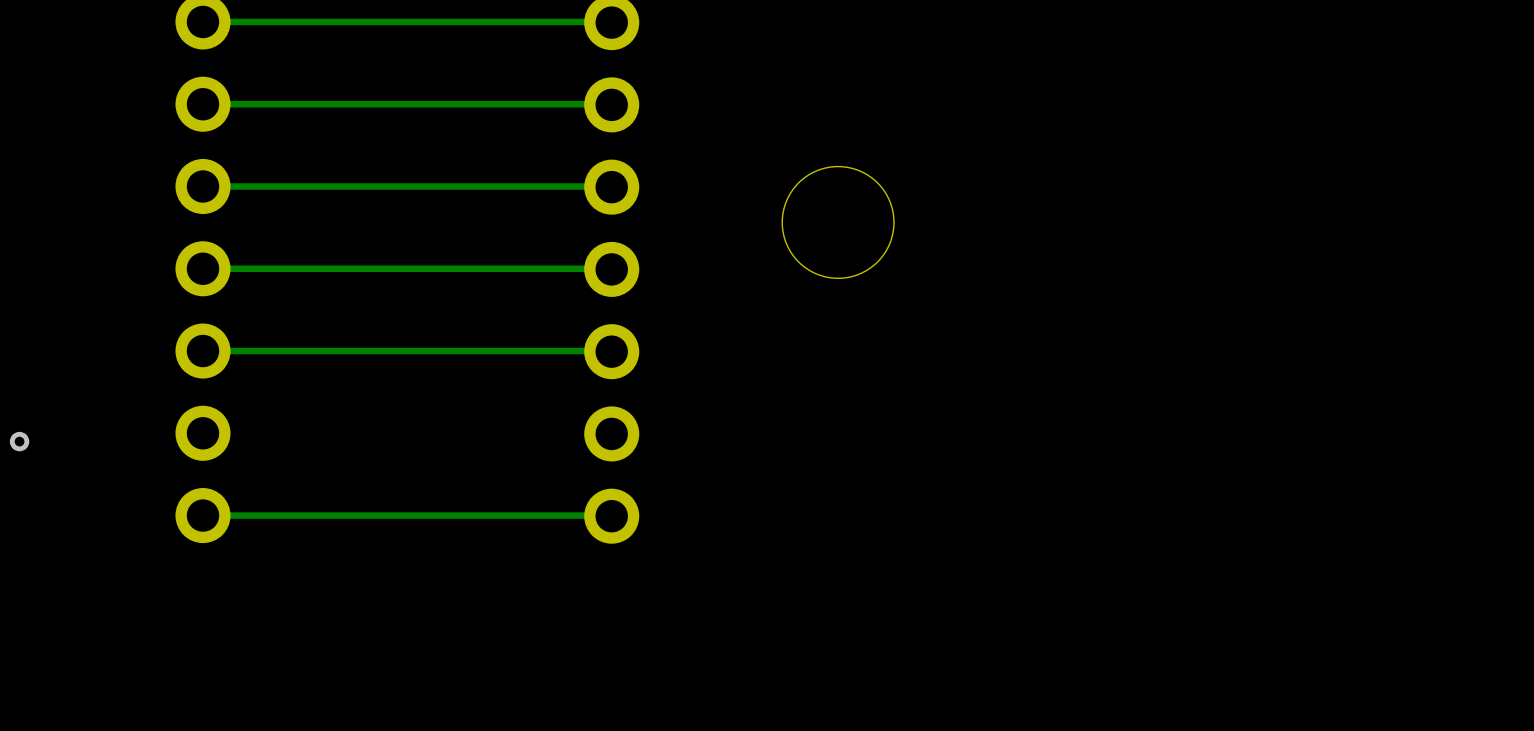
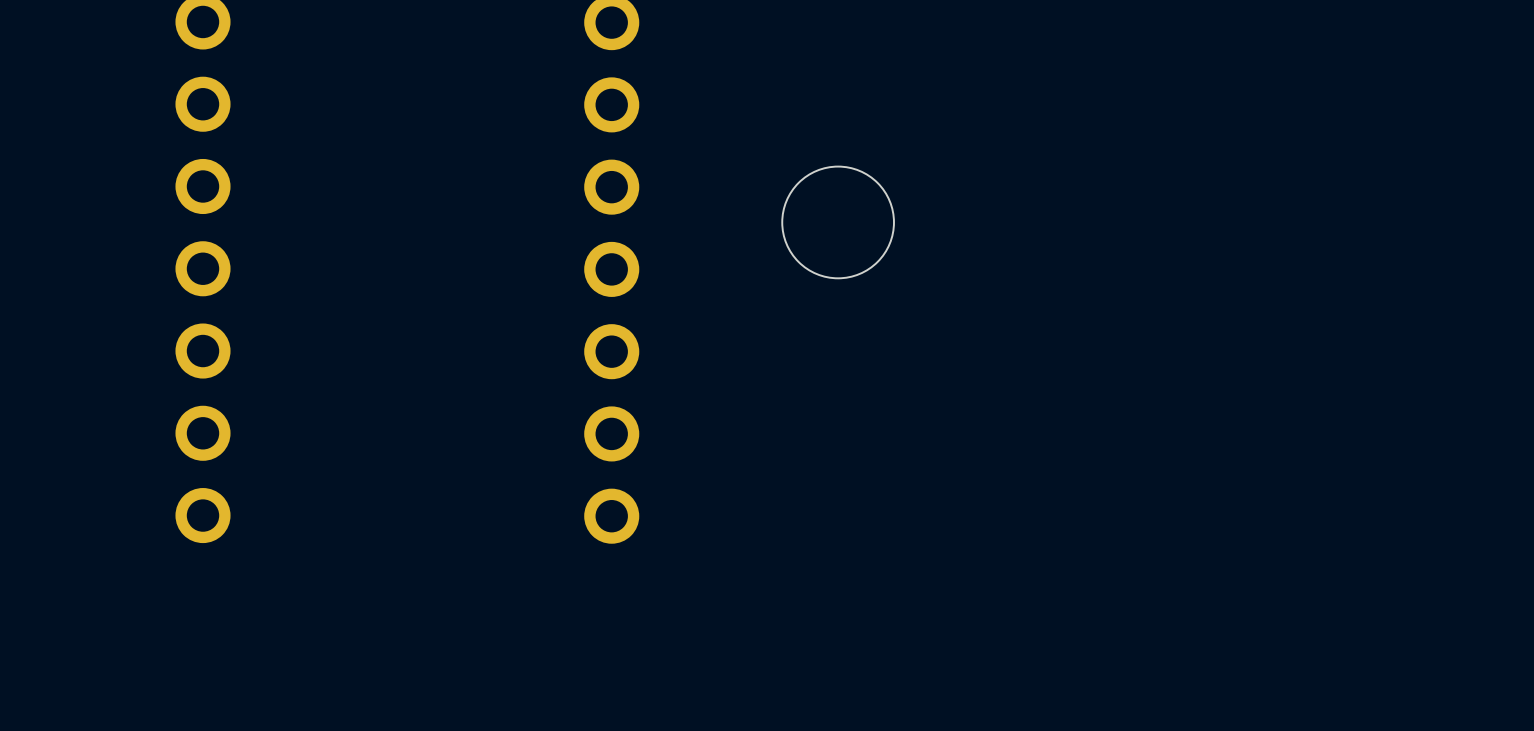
track: (611, 21) (203, 21) -> none
track: (611, 104) (203, 104) -> none
track: (611, 186) (203, 186) -> none
track: (611, 268) (203, 268) -> none
track: (611, 351) (203, 351) -> none
via: (19, 441) -> none
track: (611, 515) (203, 515) -> none

